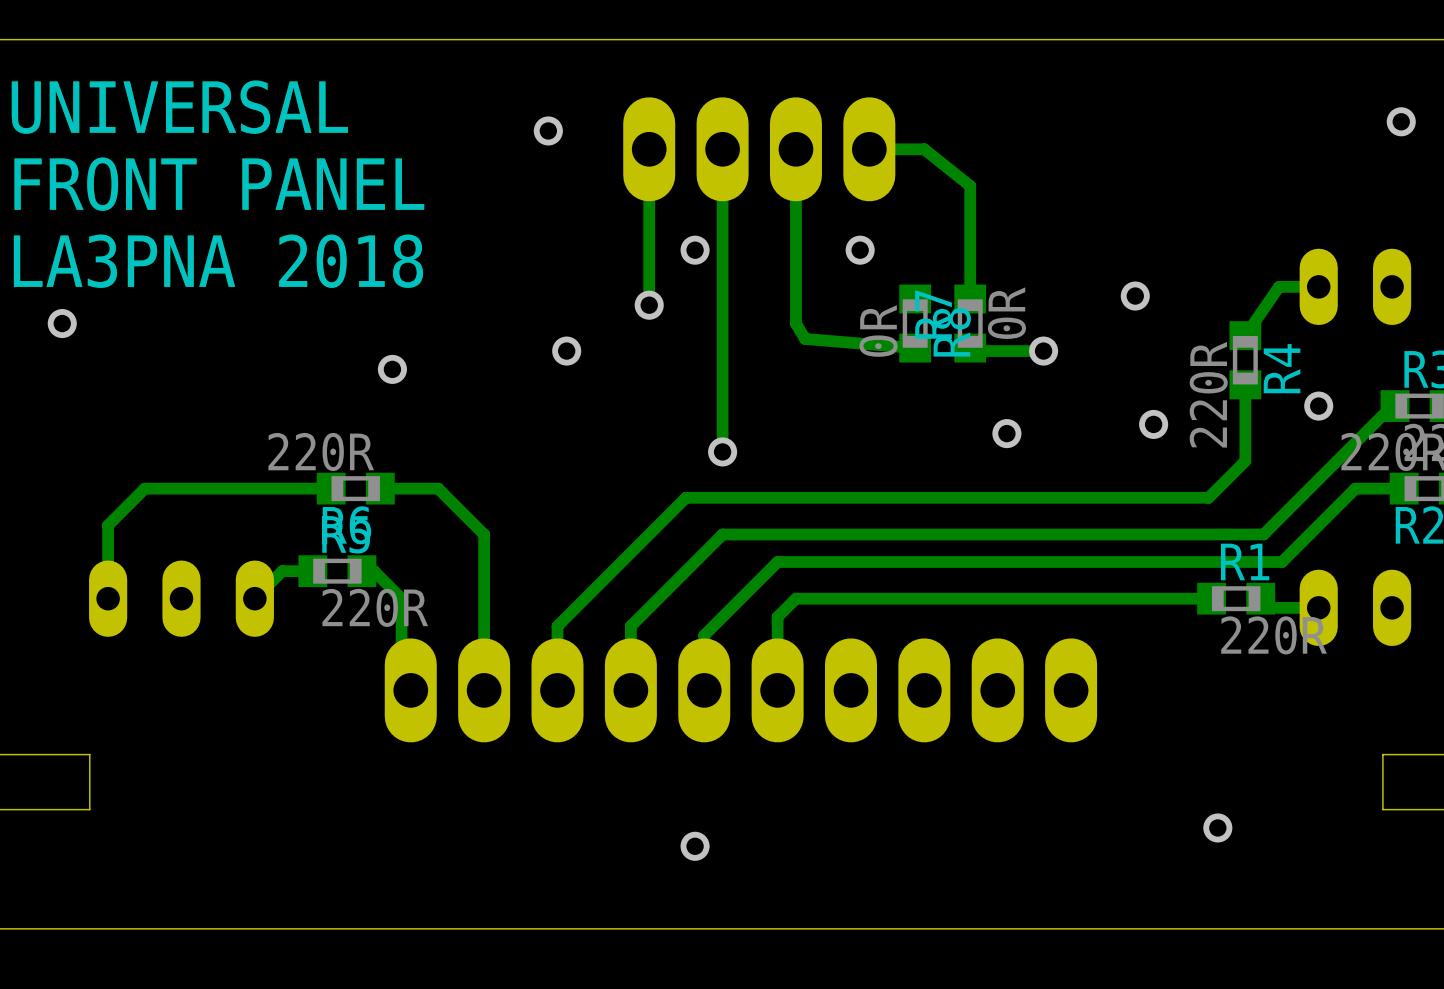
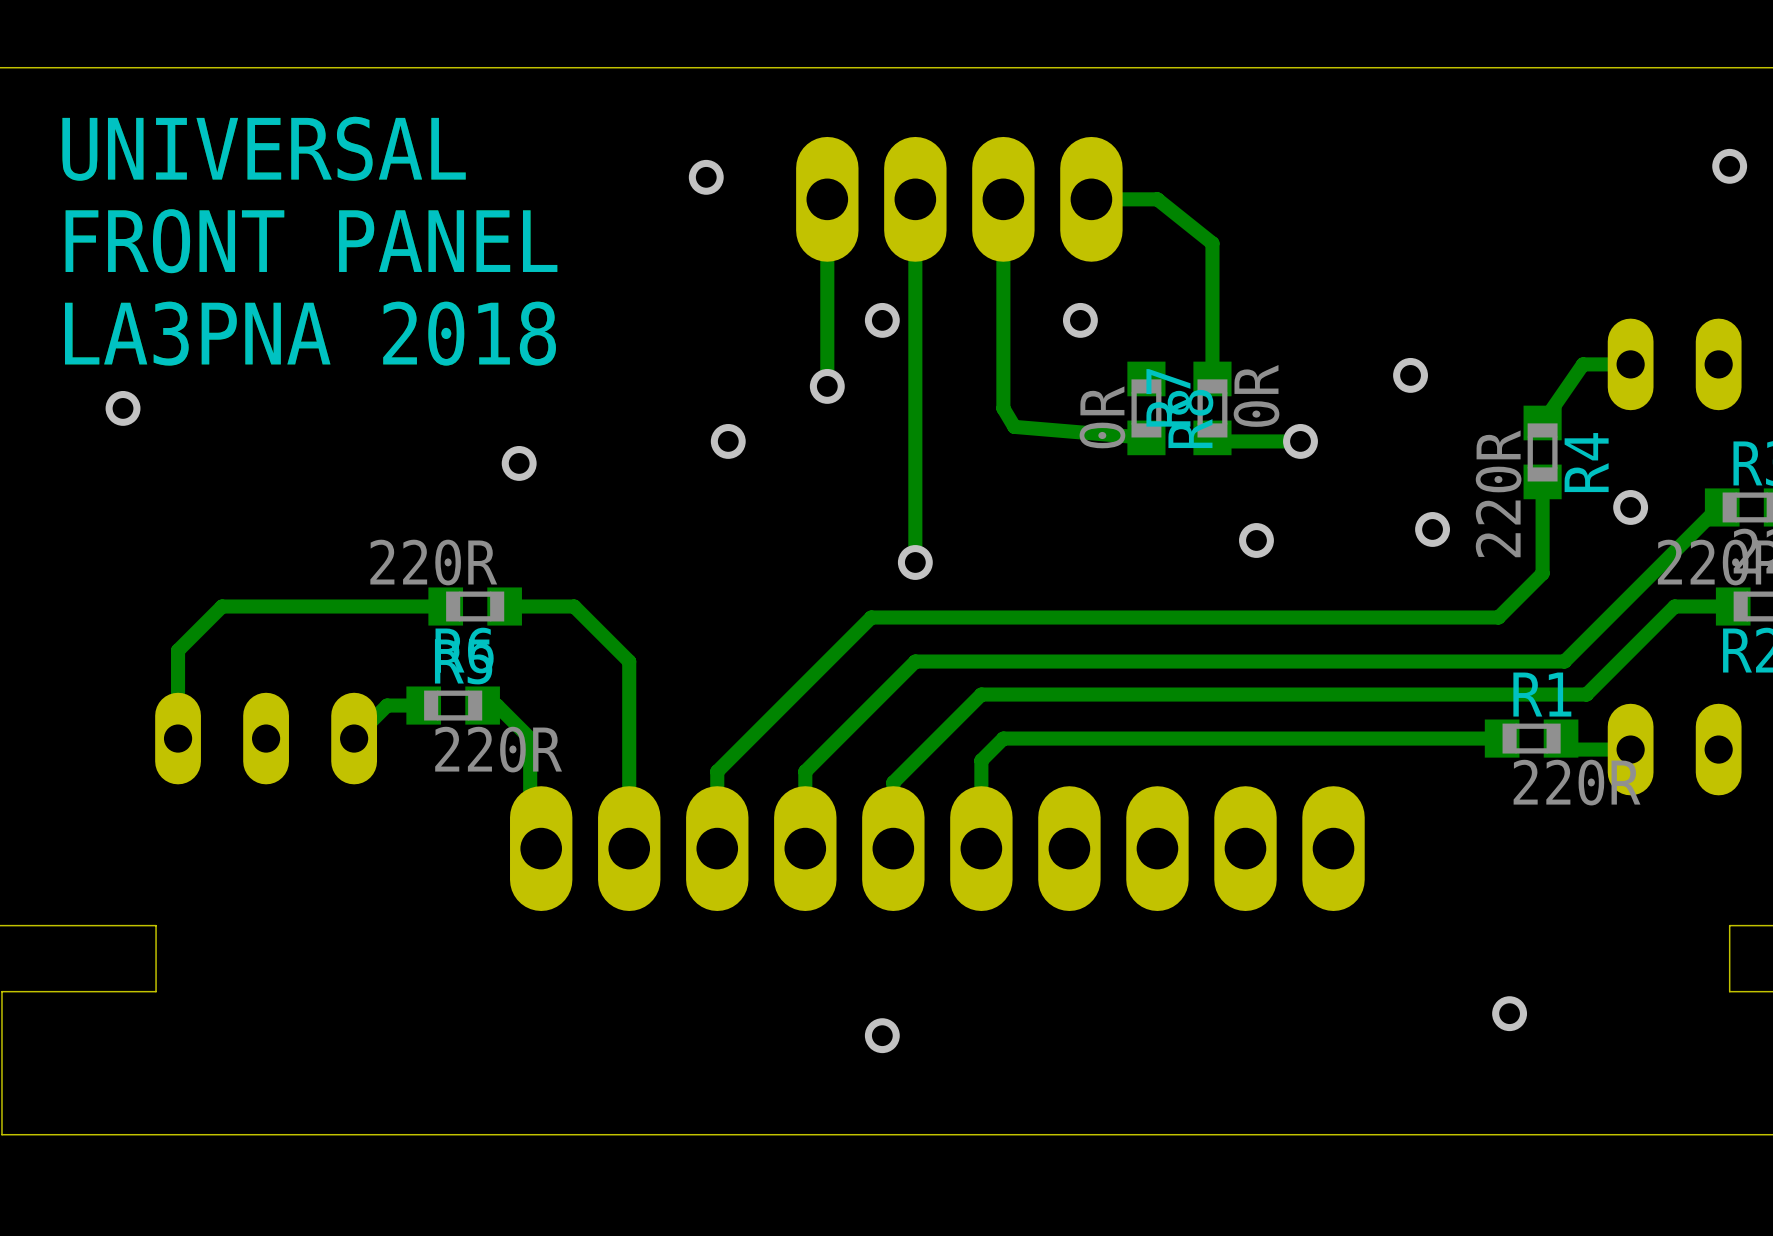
board edge: (1401, 754) (1382, 754) (1382, 809) (1401, 809) -> (1729, 925) (1729, 991)

